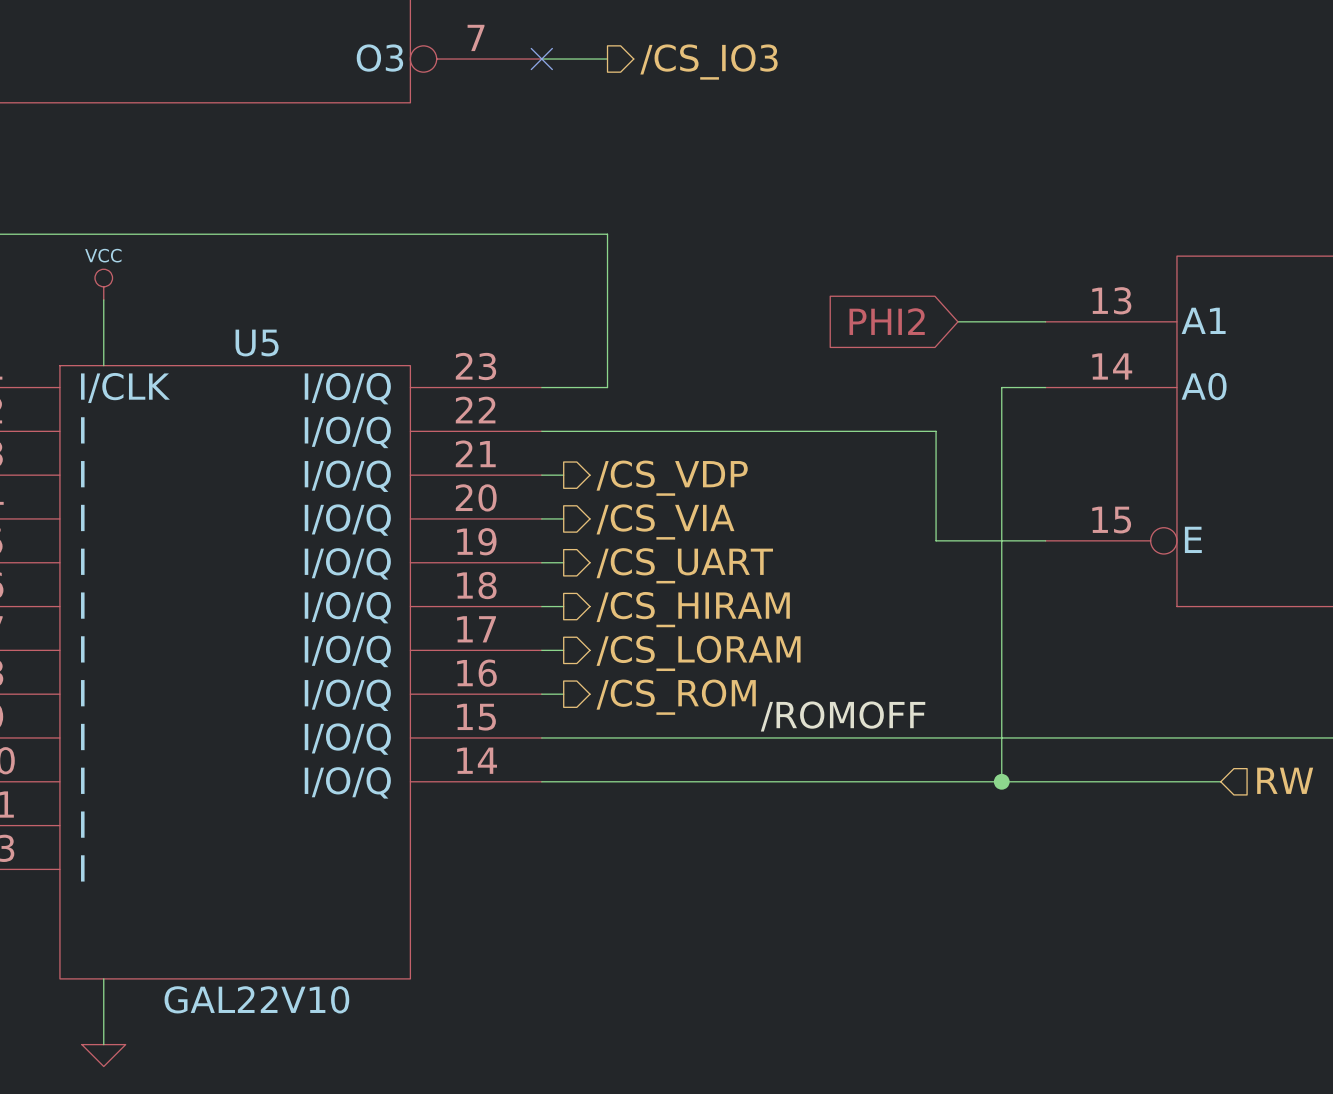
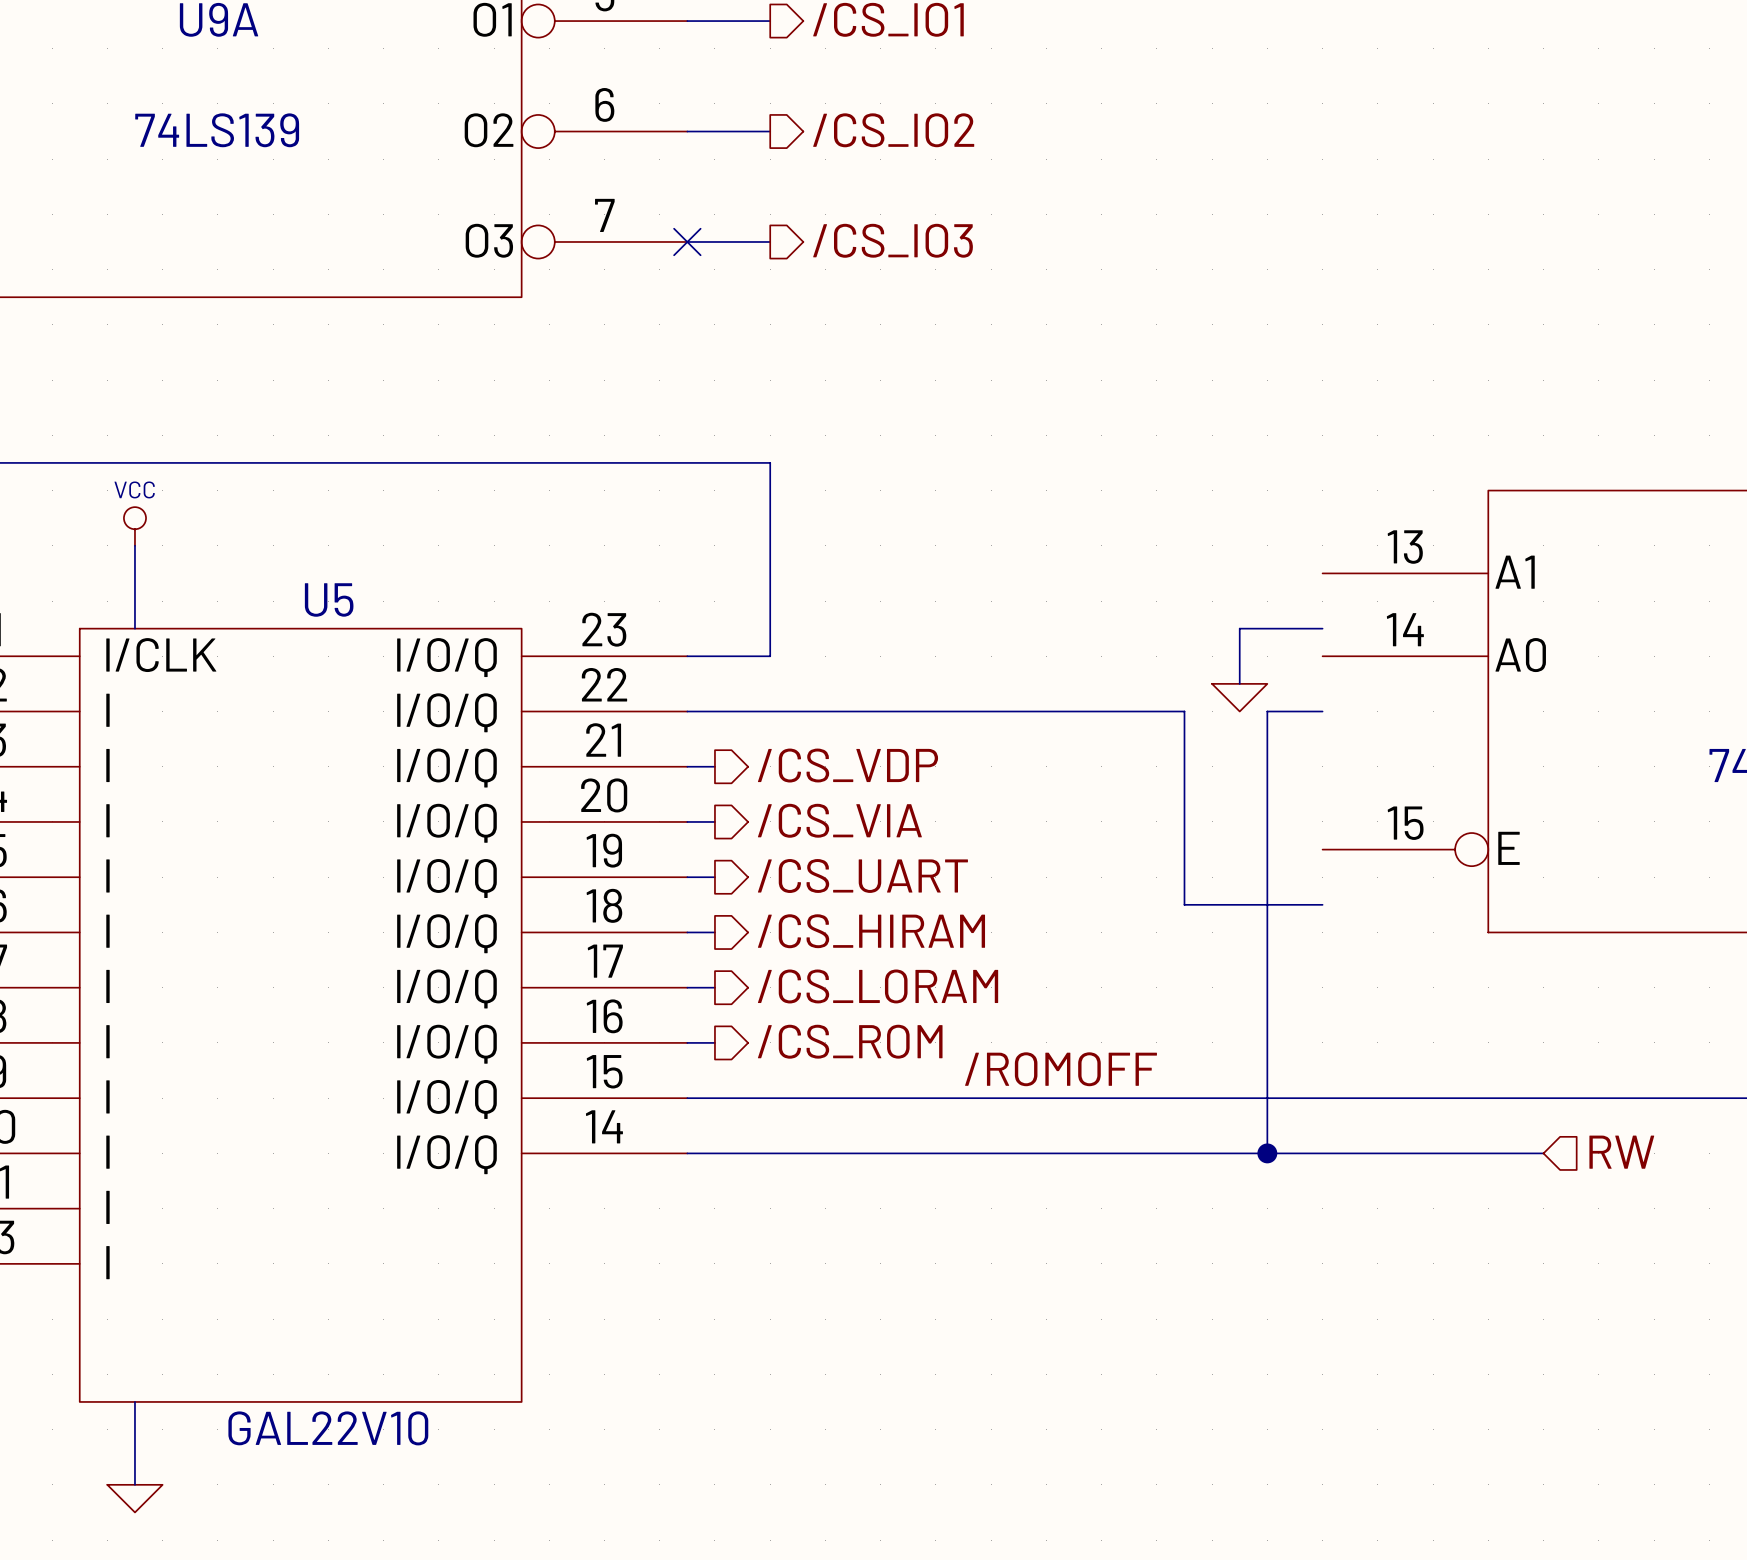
global label: PHI2 (887, 321) -> none
wire: (957, 321) (1045, 321) -> none
wire: none -> (1322, 628) (1239, 628) (1239, 683)
wire: (1045, 387) (1001, 387) (1001, 431) -> (1322, 711) (1267, 711)
power symbol: none -> (1239, 697)
wire: (936, 540) (1045, 540) -> (1184, 849) (1184, 904) (1322, 904)

